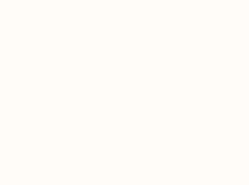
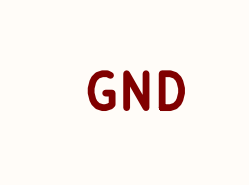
label: none -> GND (136, 90)

